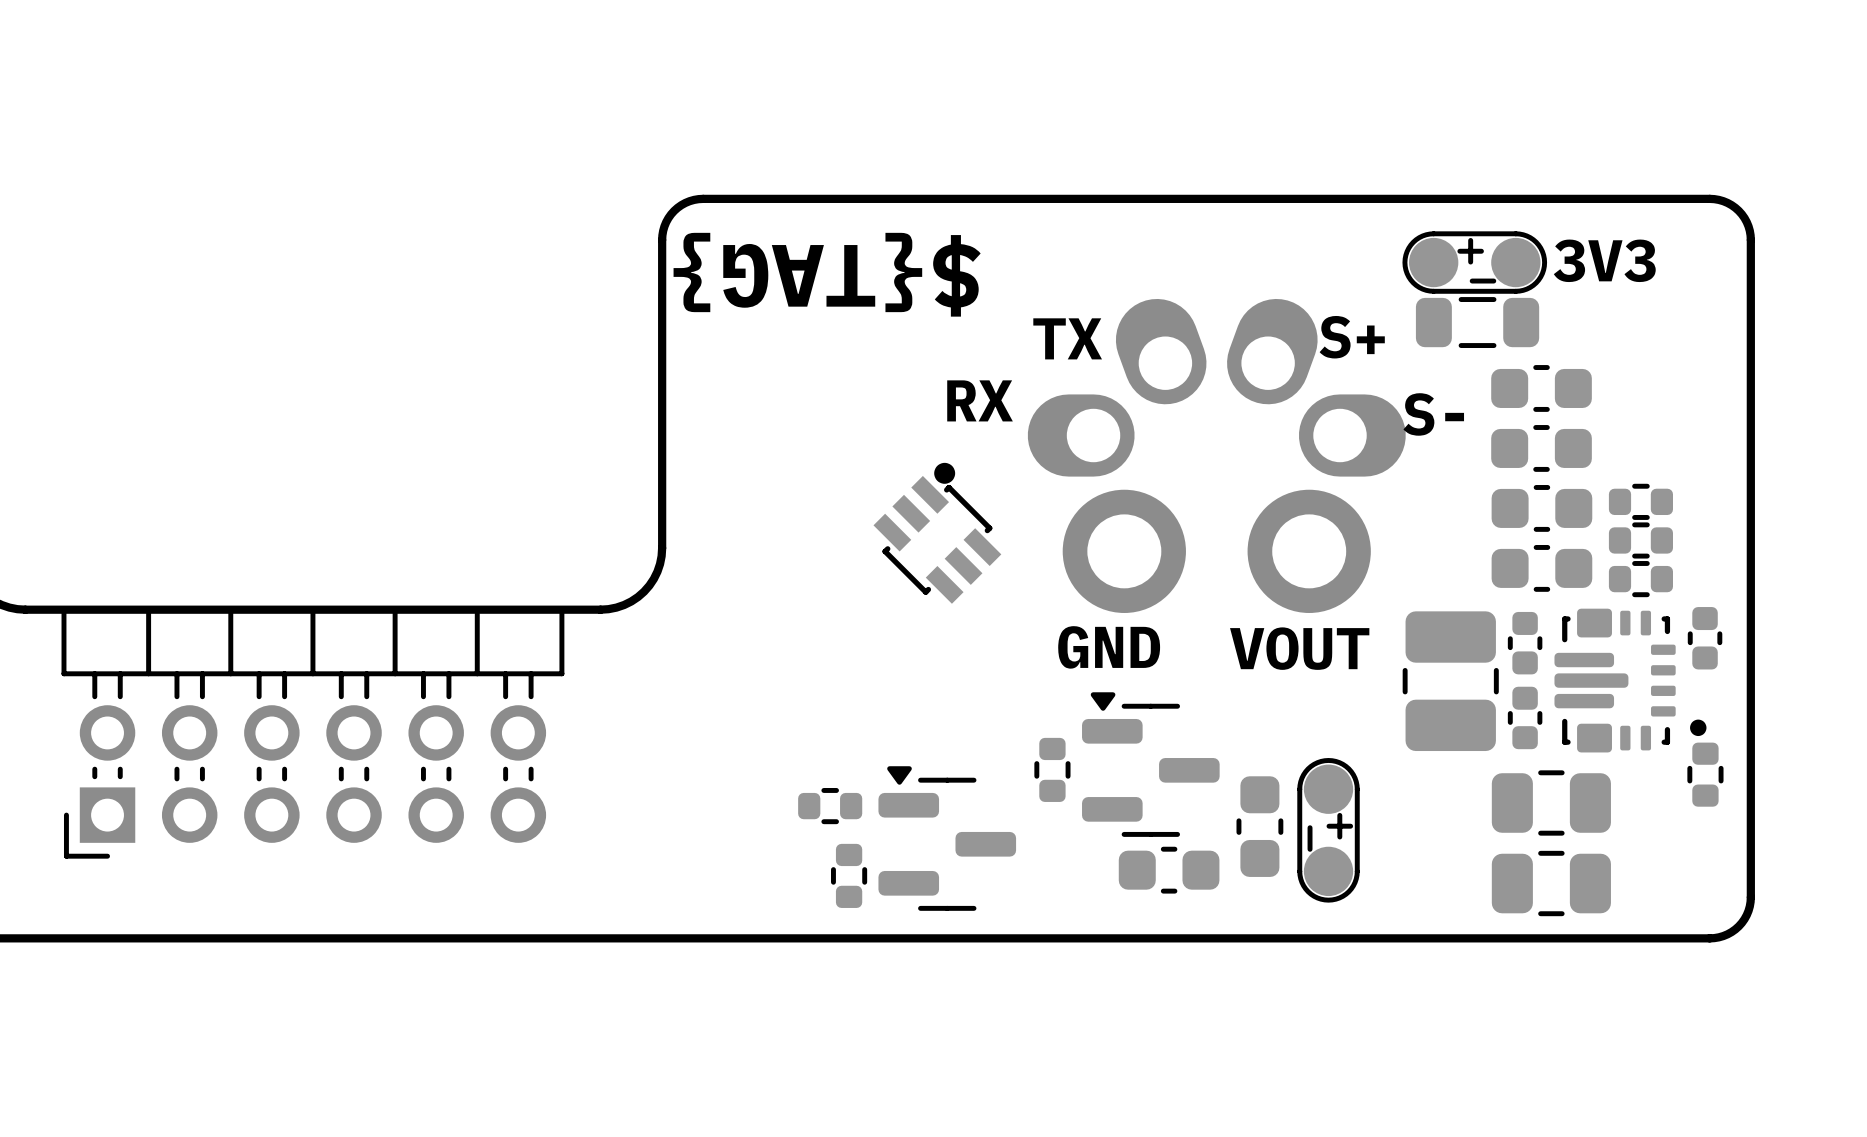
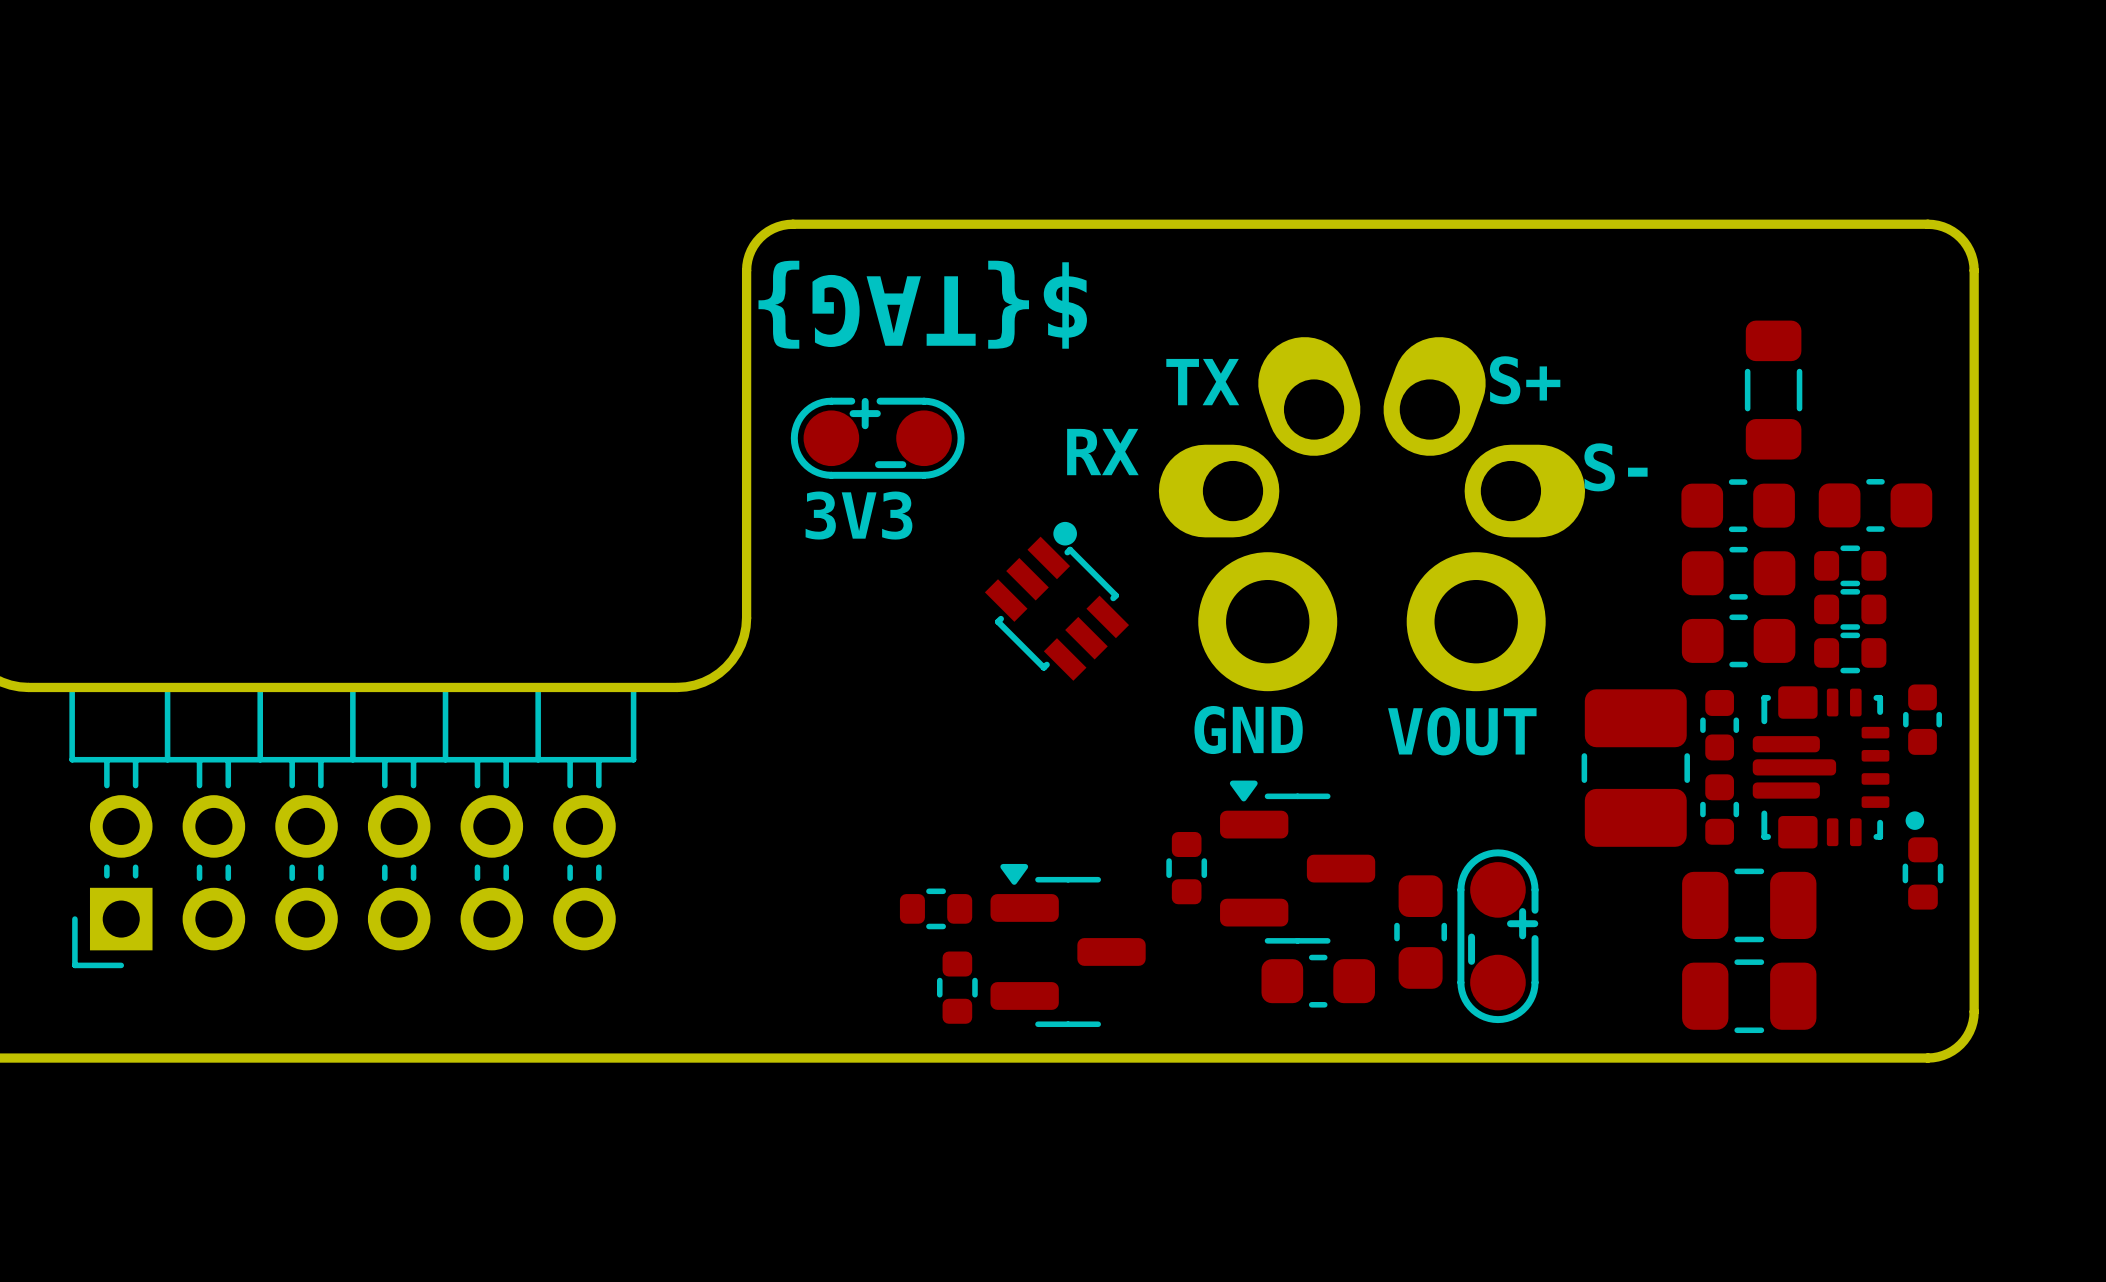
text position: 3V3 (1604, 260) -> 3V3 (858, 515)
part: (1474, 262) -> none
part rotation: 0° (1477, 322) -> 90° clockwise (1773, 390)
part position: (1477, 322) -> (1773, 390)
part: none -> (877, 438)
part position: (1541, 388) -> (1875, 505)
part footprint: [1297, 758, 1360, 903] -> [1457, 849, 1539, 1024]

